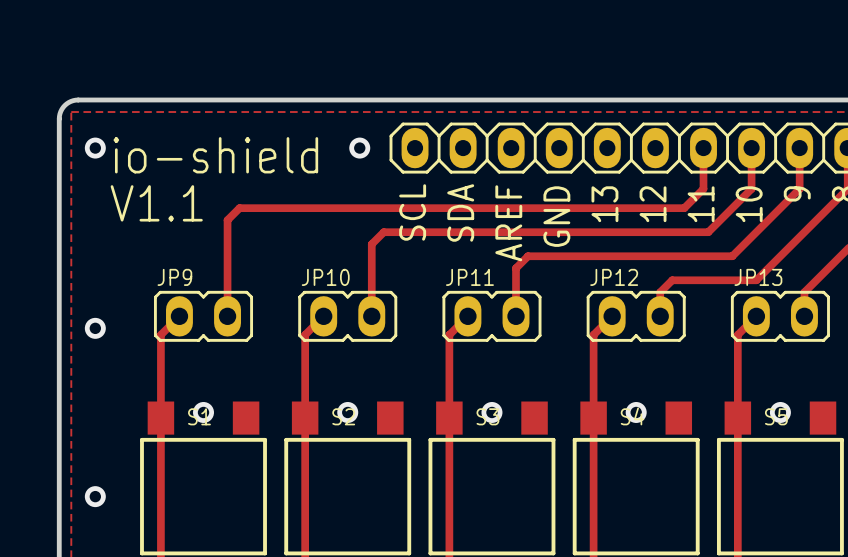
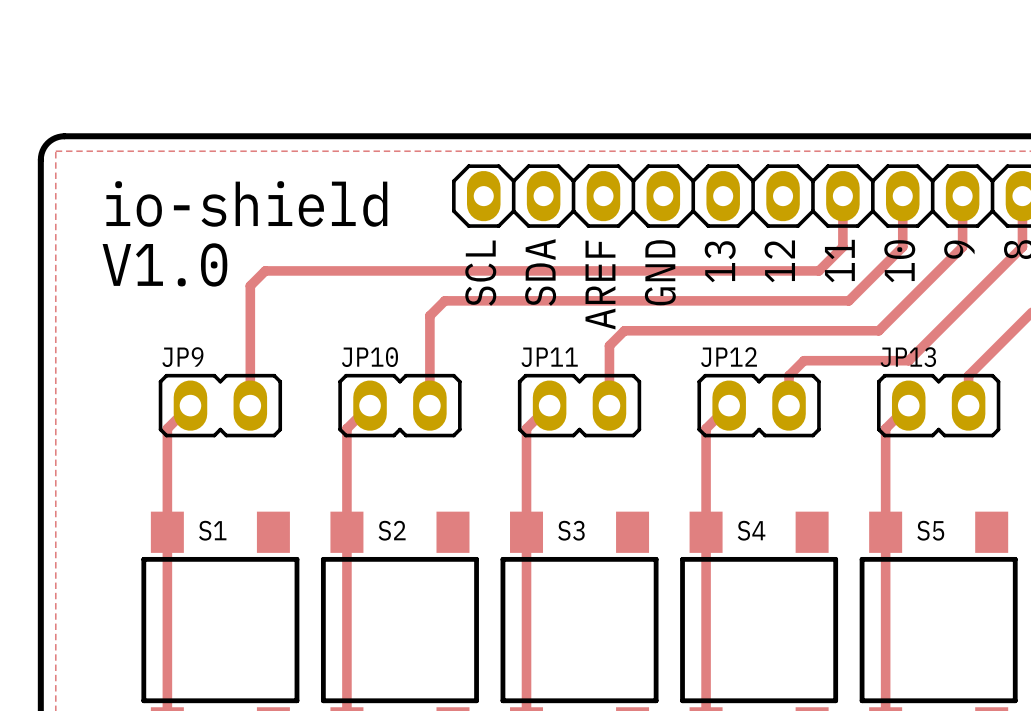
via: (95, 148) -> none
via: (359, 148) -> none
text: V1.1 (156, 203) -> V1.0 (164, 264)
via: (95, 328) -> none
via: (203, 412) -> none
via: (347, 412) -> none
via: (491, 412) -> none
via: (636, 412) -> none
via: (780, 412) -> none
via: (95, 496) -> none

